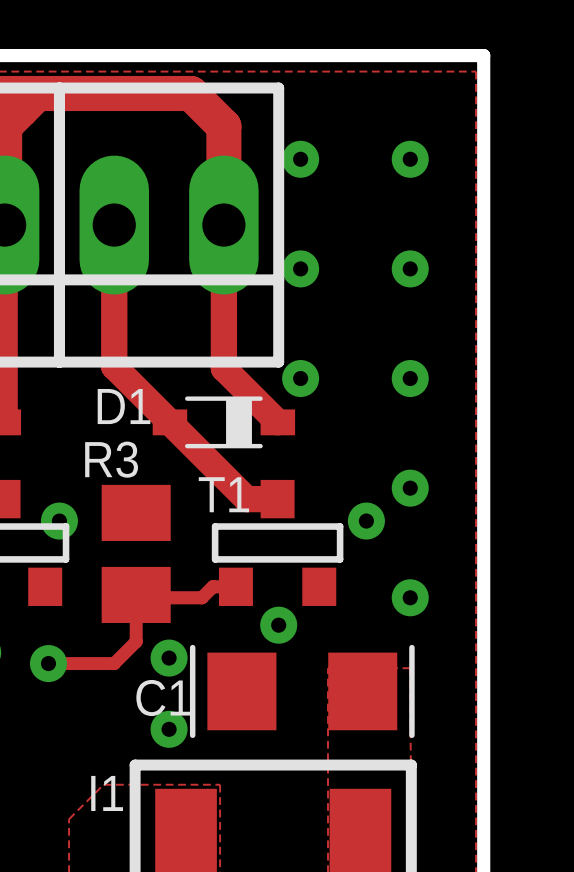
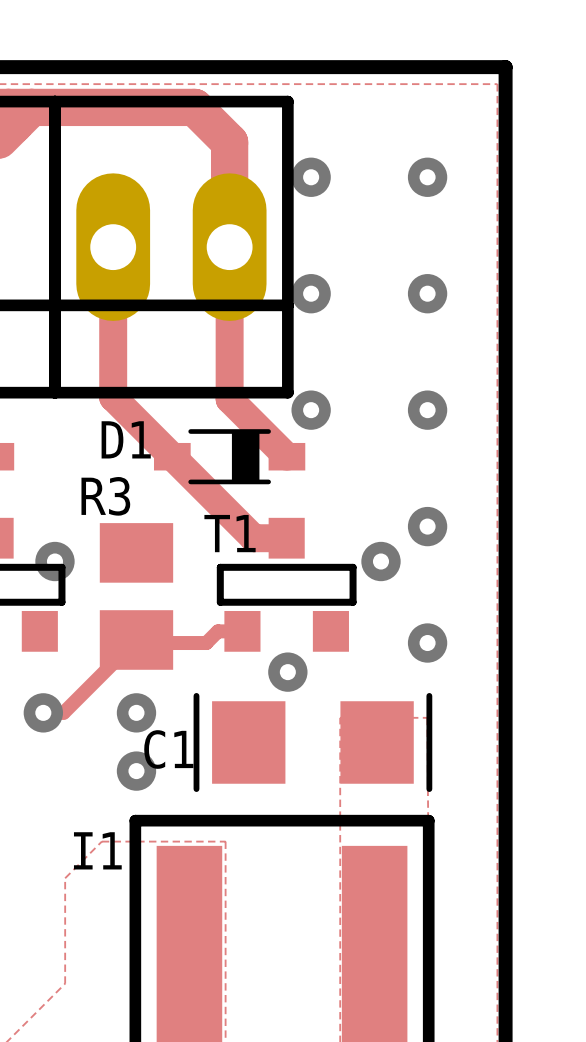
track: (136, 594) (136, 641) (114, 663) (67, 663) -> (136, 639) (63, 712)
via position: (169, 658) -> (136, 712)
via position: (169, 729) -> (136, 771)

